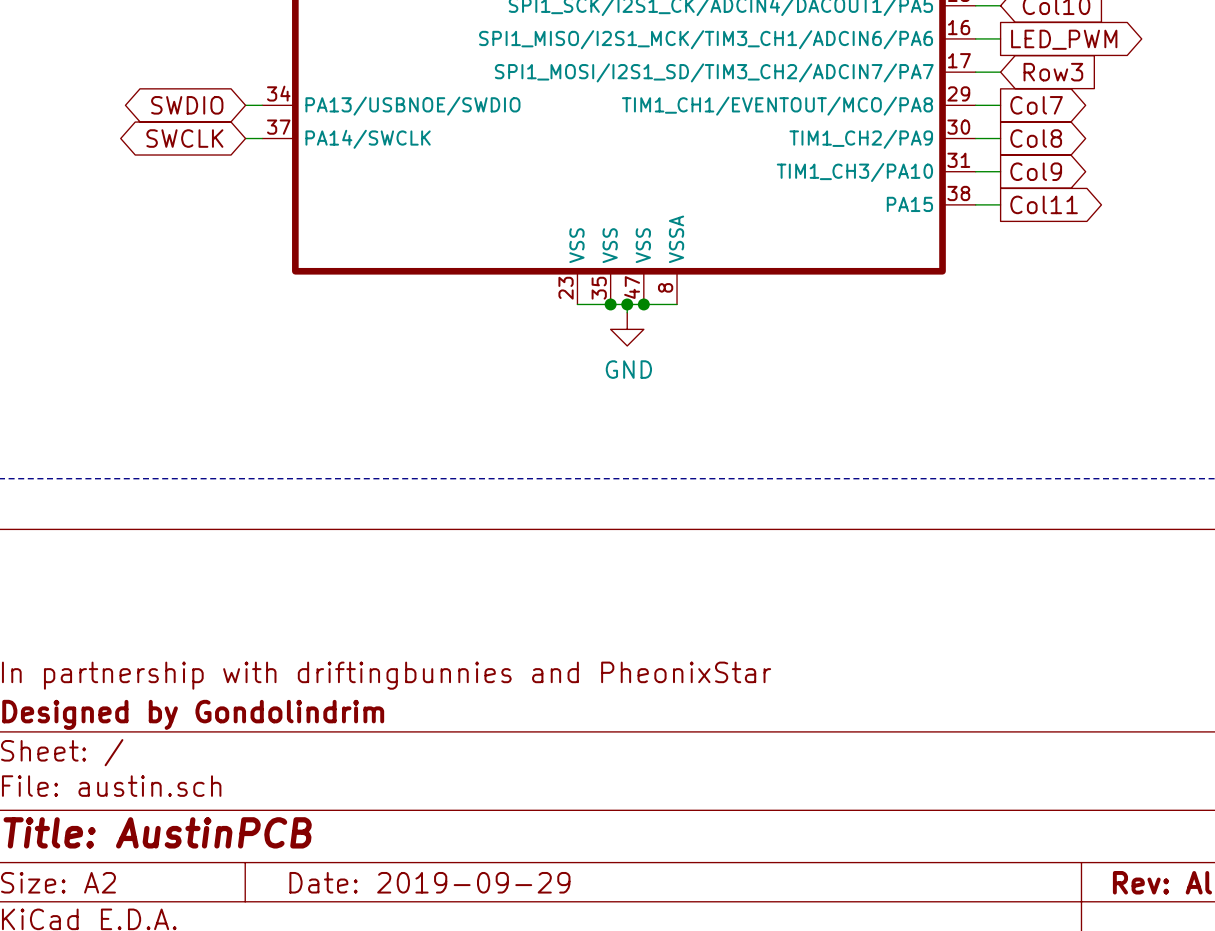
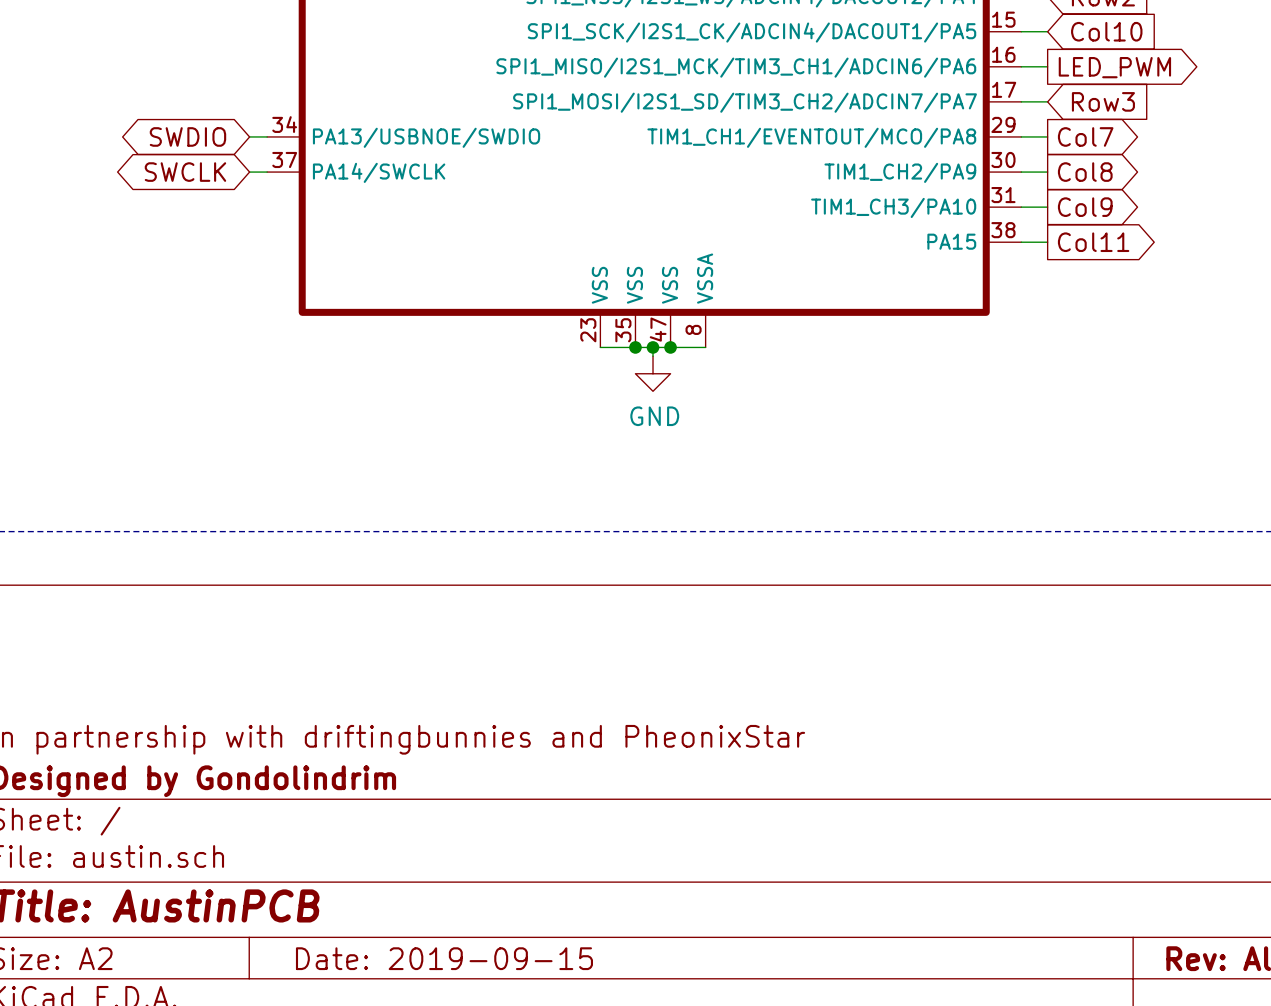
title block: Date: 2019-09-29 (429, 882) -> Date: 2019-09-15 (444, 958)

